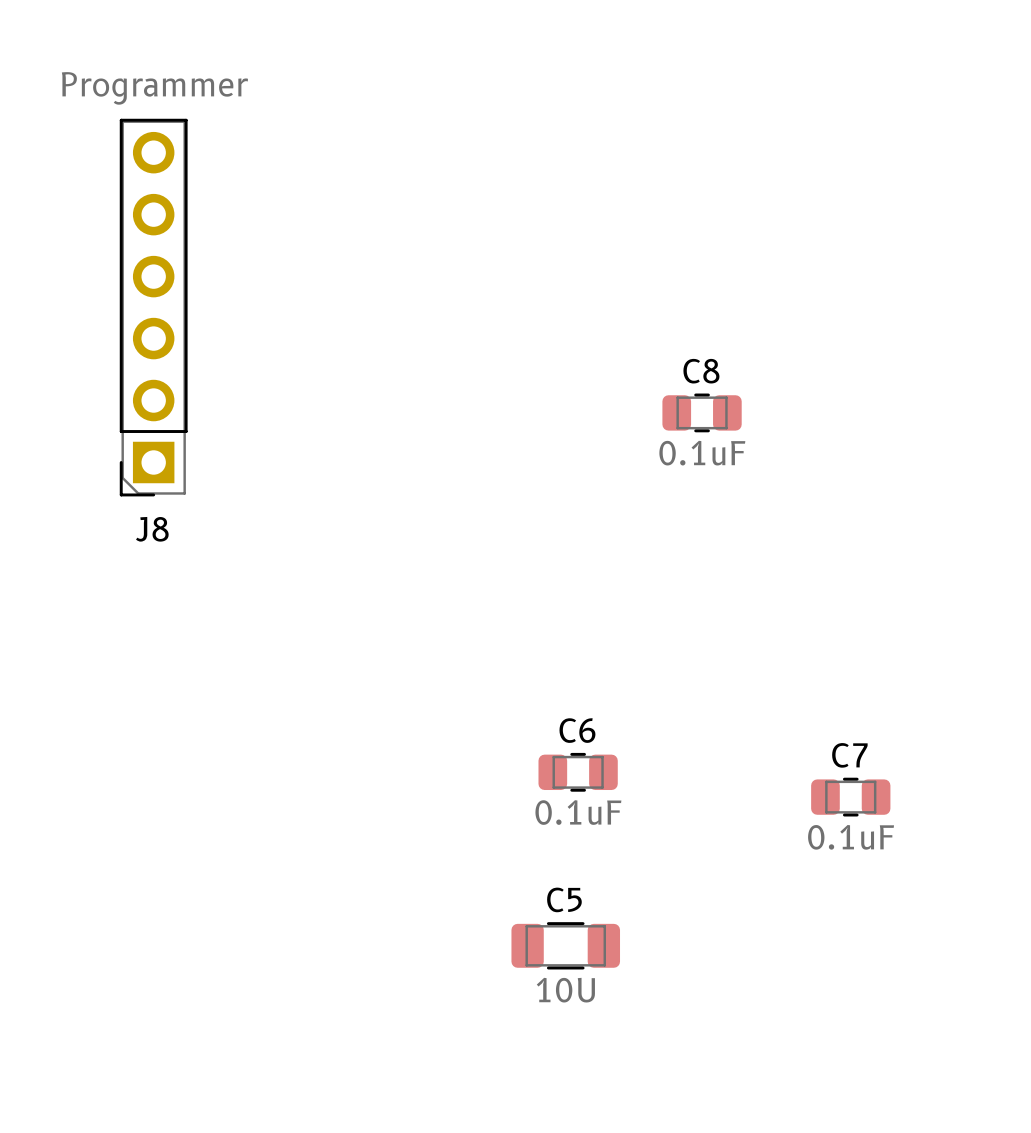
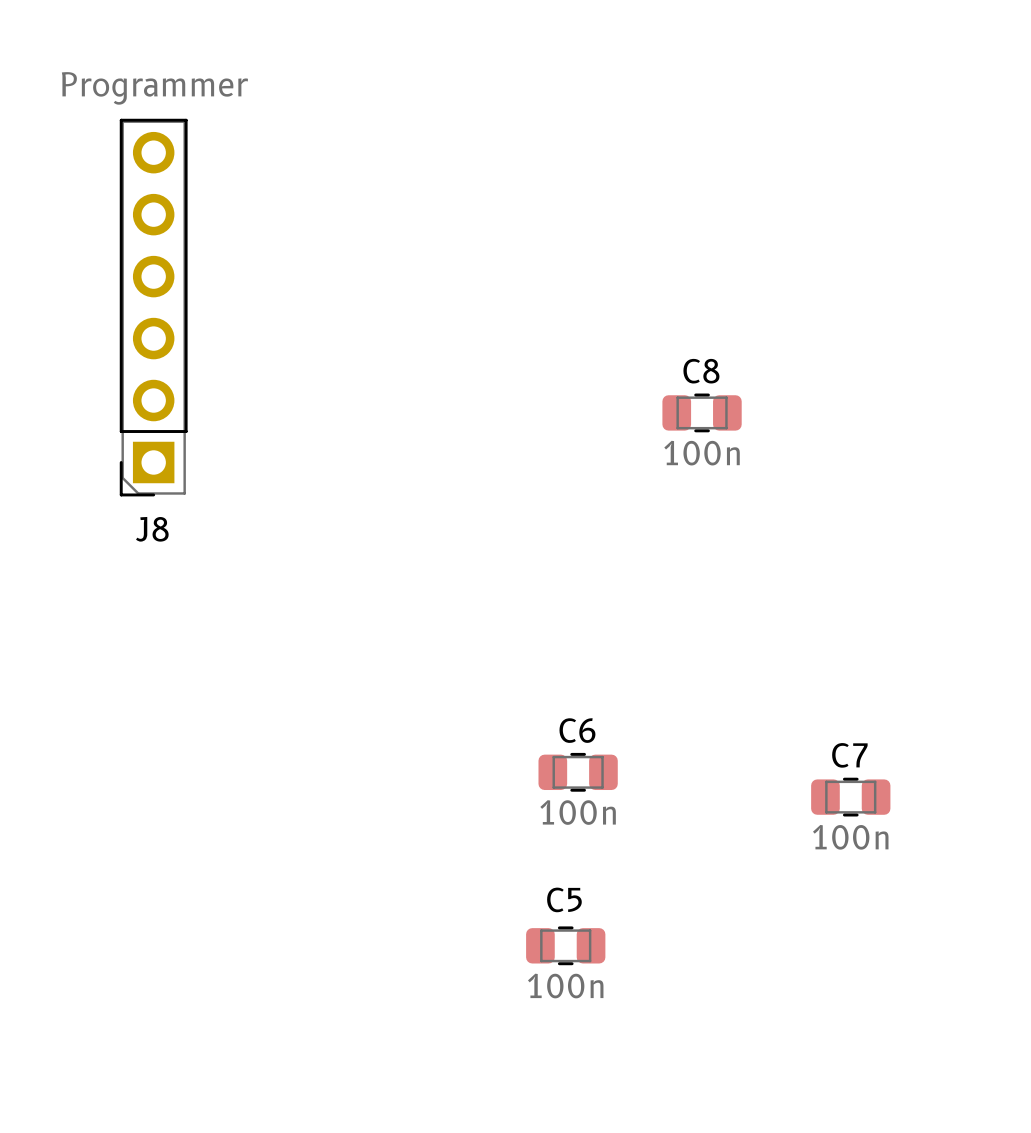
C8 value: 0.1uF (702, 453) -> 100n (702, 453)
C6 value: 0.1uF (578, 812) -> 100n (578, 812)
C7 value: 0.1uF (851, 837) -> 100n (850, 837)
C5 footprint: [511, 922, 621, 970] -> [526, 926, 606, 966]
C5 value: 10U (565, 990) -> 100n (565, 986)

